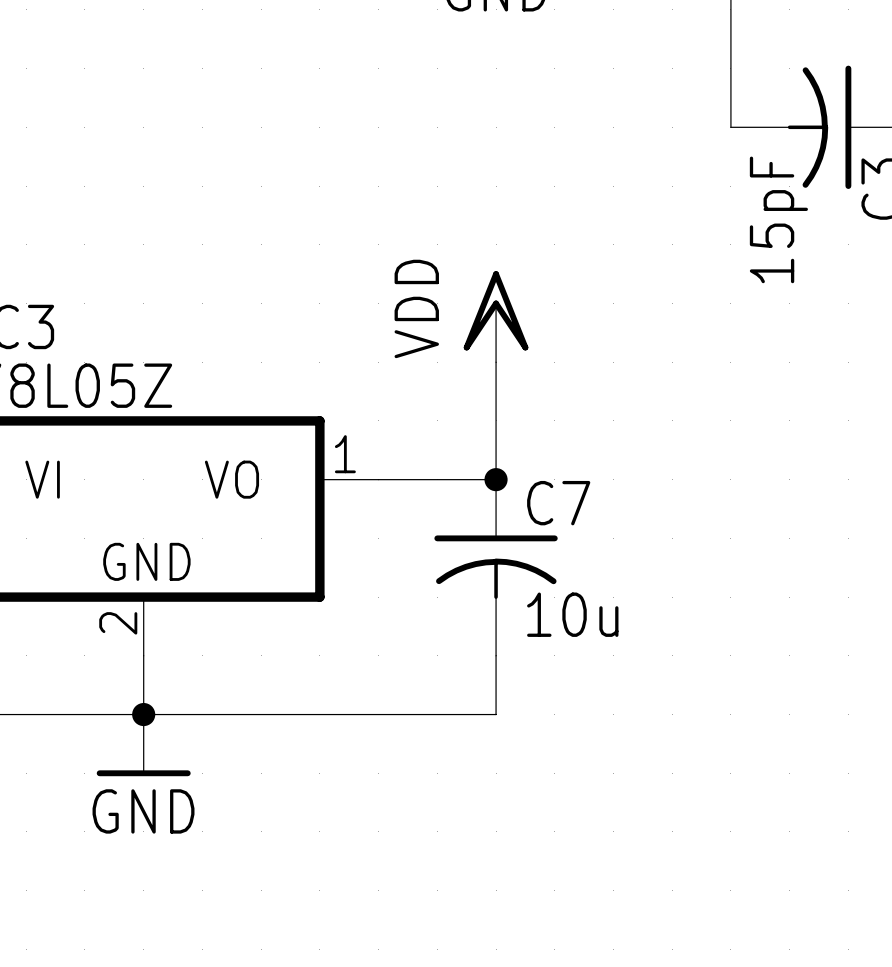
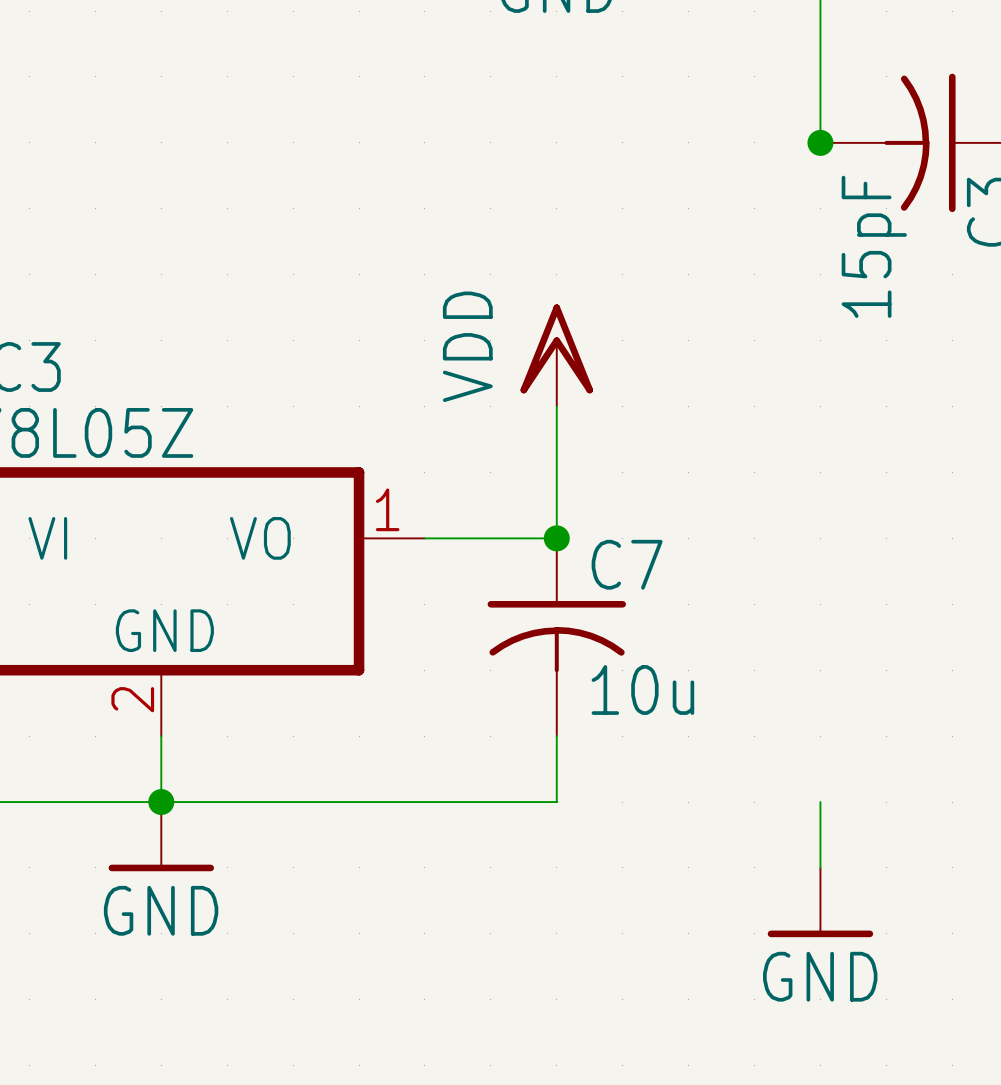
junction: none -> (820, 142)
wire: none -> (820, 802) (820, 867)
power symbol: none -> GND (820, 902)

